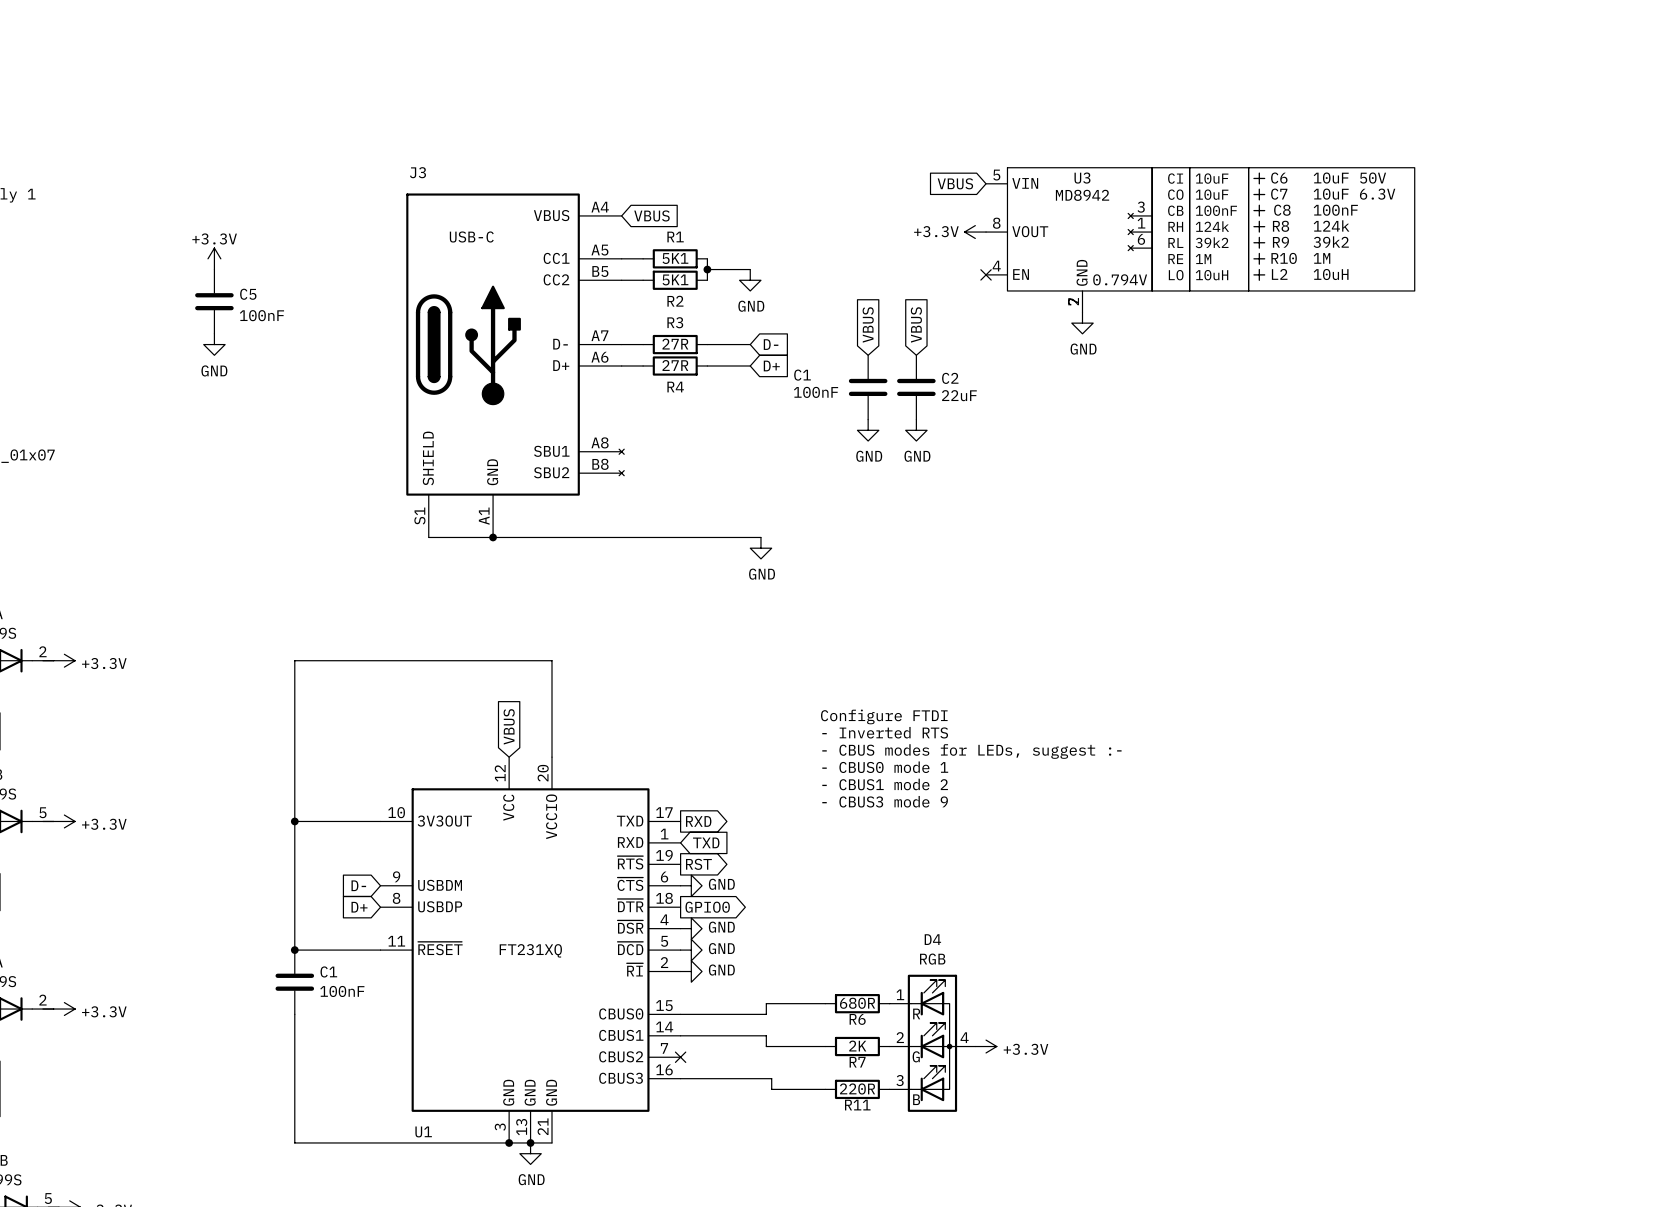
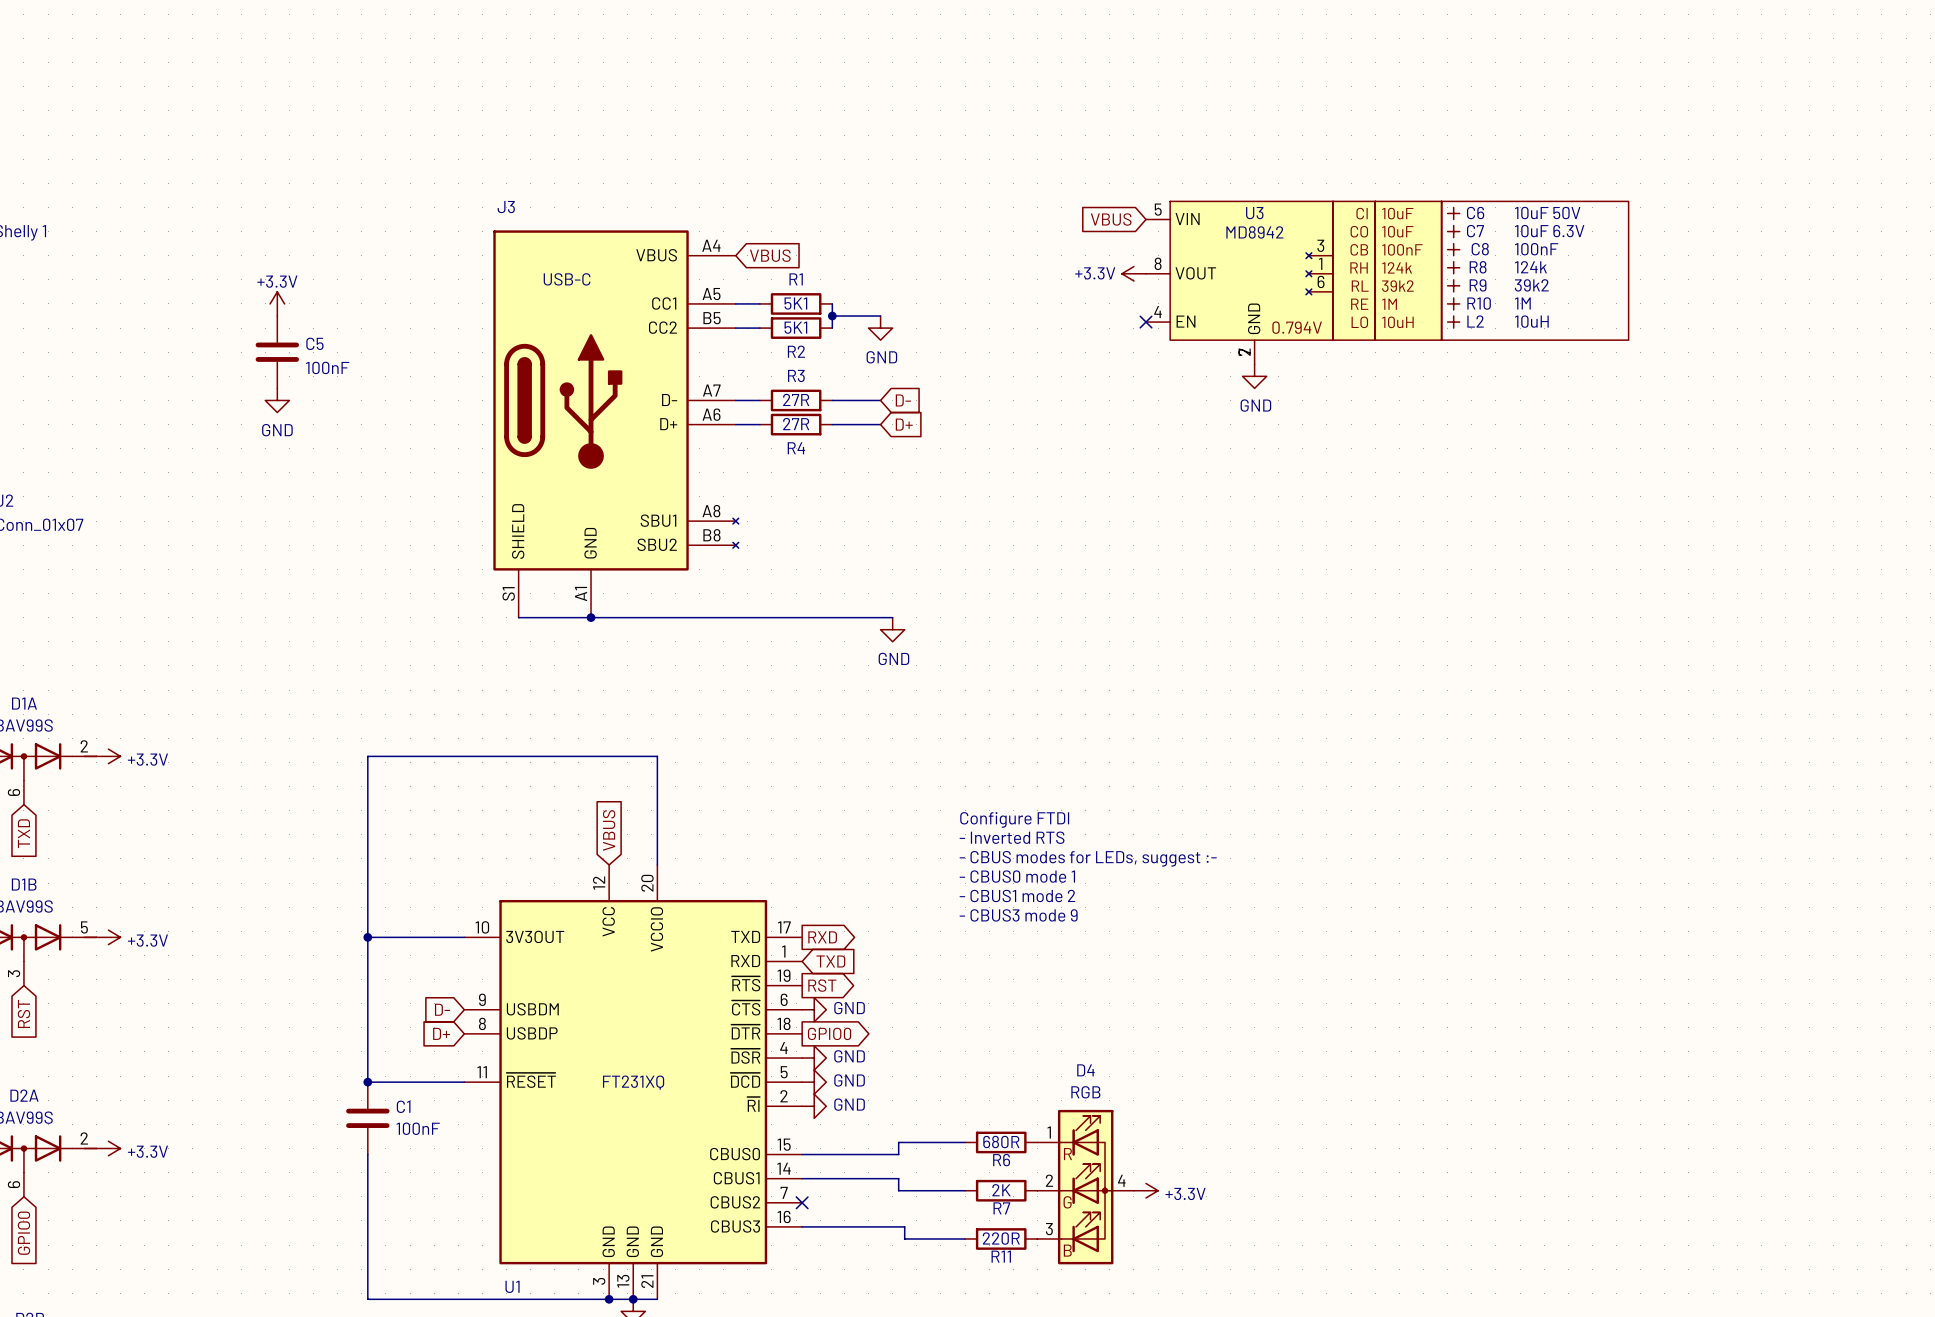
global label: VBUS (868, 324) -> none
global label: VBUS (916, 324) -> none
C1: 100nF (868, 387) -> none
C2: 22uF (916, 387) -> none
power symbol: GND (868, 430) -> none
power symbol: GND (916, 430) -> none

